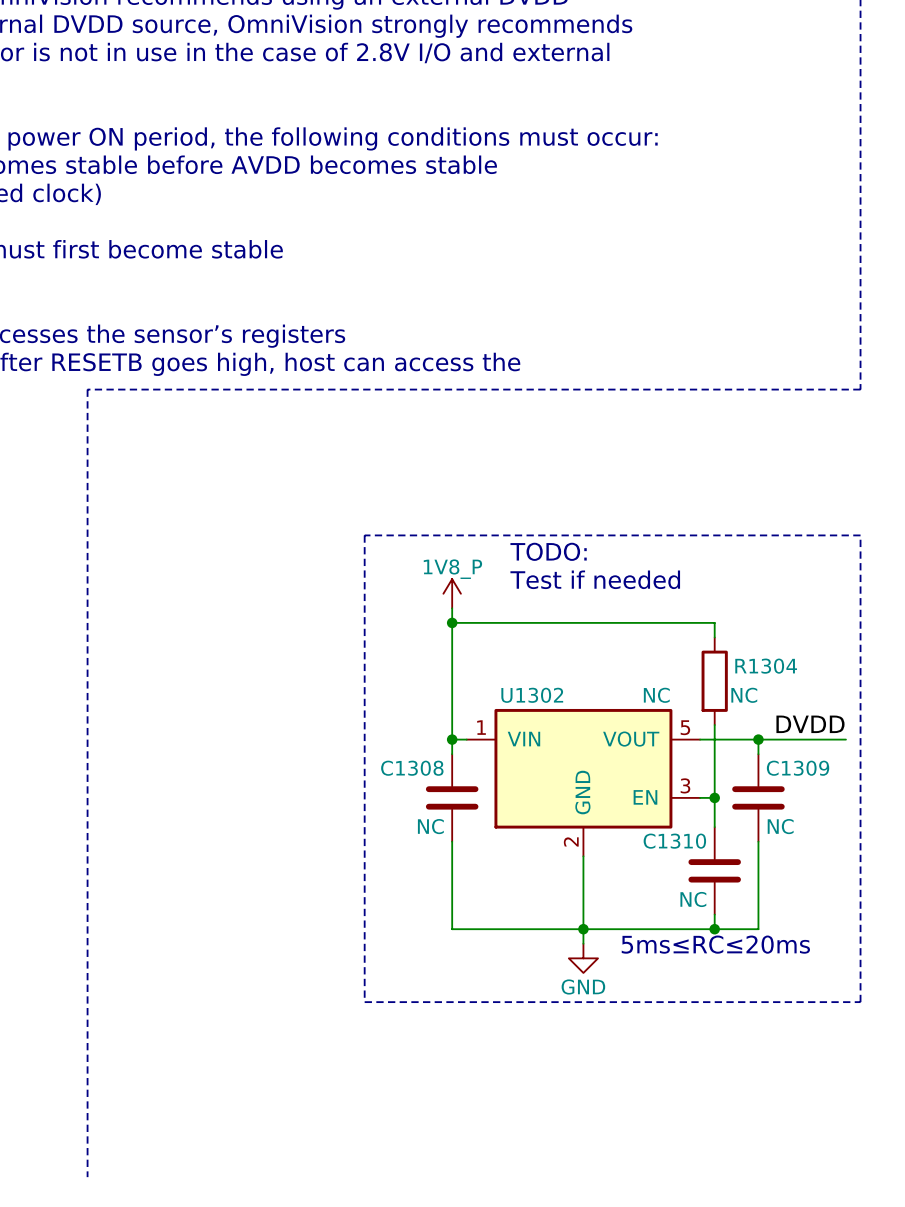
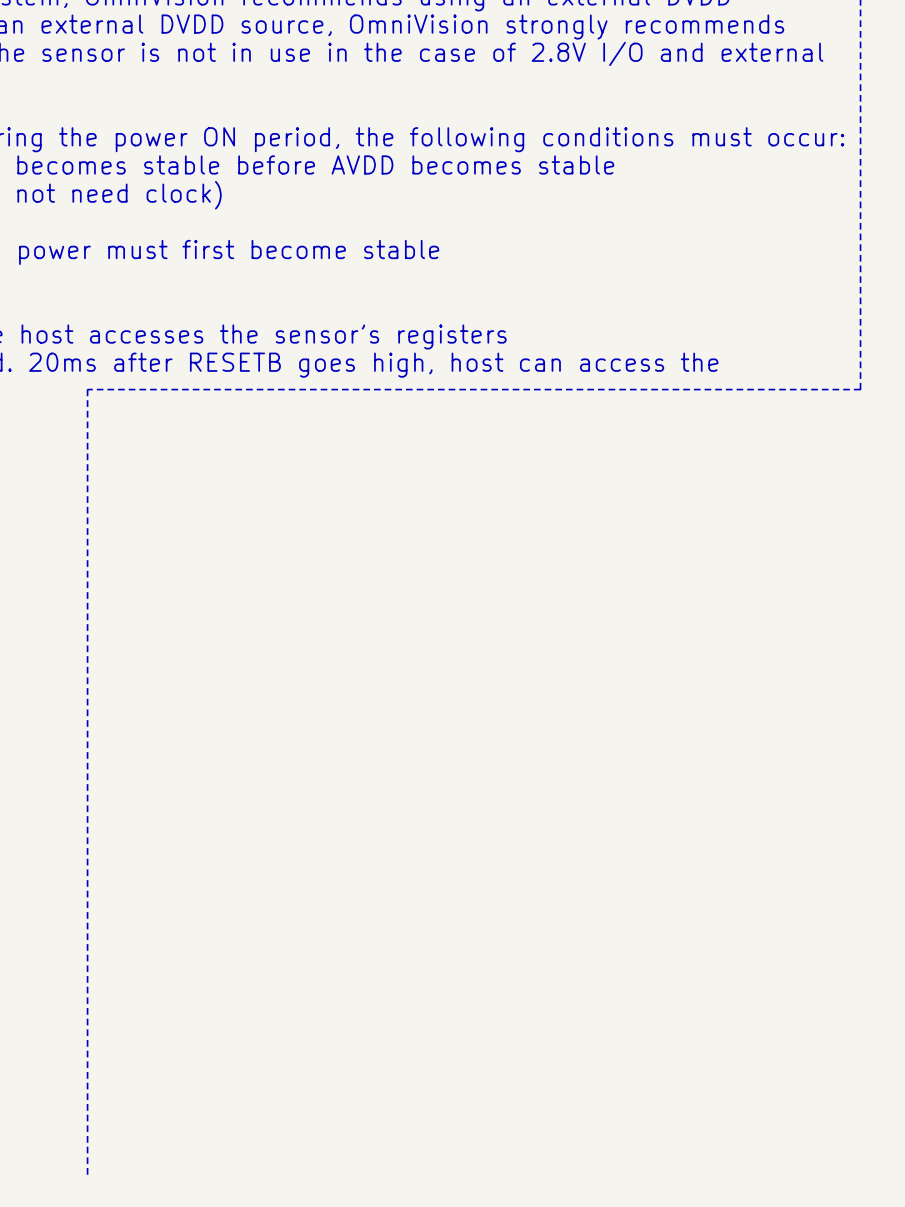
line: (364, 535) (364, 1002) (860, 1002) (860, 535) (364, 535) -> none
text: TODO: (548, 551) -> none
text: Test if needed (595, 579) -> none
power symbol: 1V8_P (452, 593) -> none
wire: (452, 608) (452, 754) -> none
wire: (452, 622) (714, 622) (714, 637) -> none
junction: (452, 622) -> none
R1304: NC (714, 681) -> none
label: DVDD (810, 724) -> none
wire: (714, 725) (714, 827) -> none
wire: (452, 739) (466, 739) -> none
junction: (452, 739) -> none
wire: (700, 739) (845, 739) -> none
wire: (758, 739) (758, 754) -> none
junction: (758, 739) -> none
U1302: NC (583, 782) -> none
C1308: NC (452, 797) -> none
wire: (700, 797) (714, 797) -> none
junction: (714, 797) -> none
C1309: NC (758, 797) -> none
wire: (452, 841) (452, 929) (758, 929) (758, 841) -> none
wire: (583, 856) (583, 943) -> none
C1310: NC (714, 870) -> none
wire: (714, 914) (714, 929) -> none
junction: (583, 929) -> none
junction: (714, 929) -> none
text: 5ms≤RC≤20ms (715, 944) -> none
power symbol: GND (583, 958) -> none

